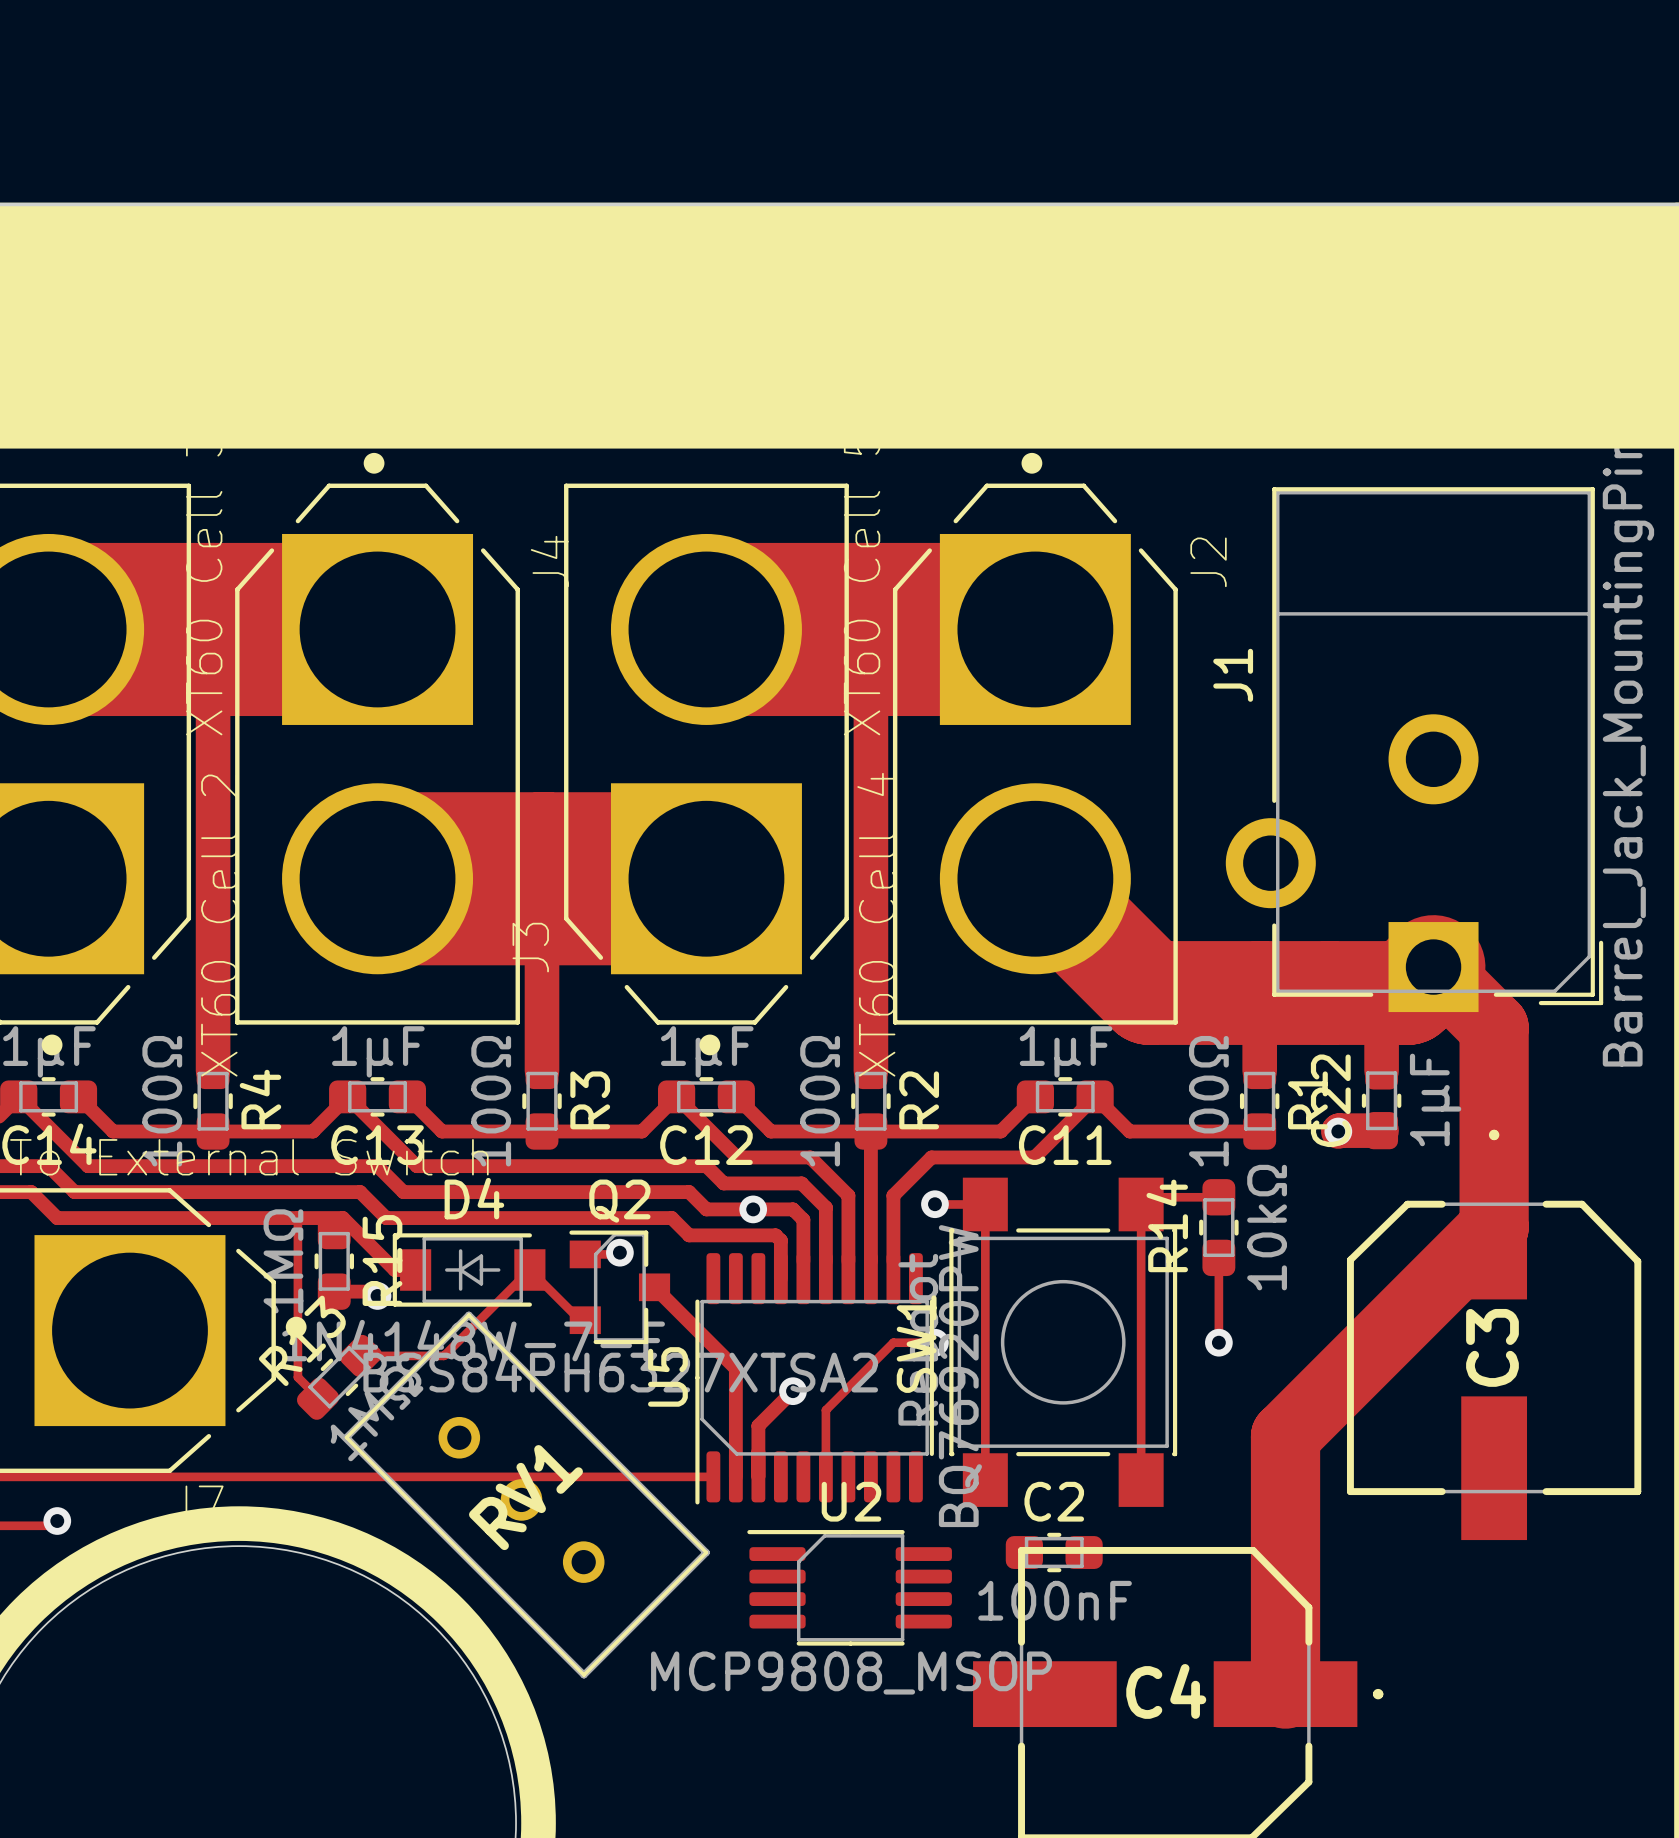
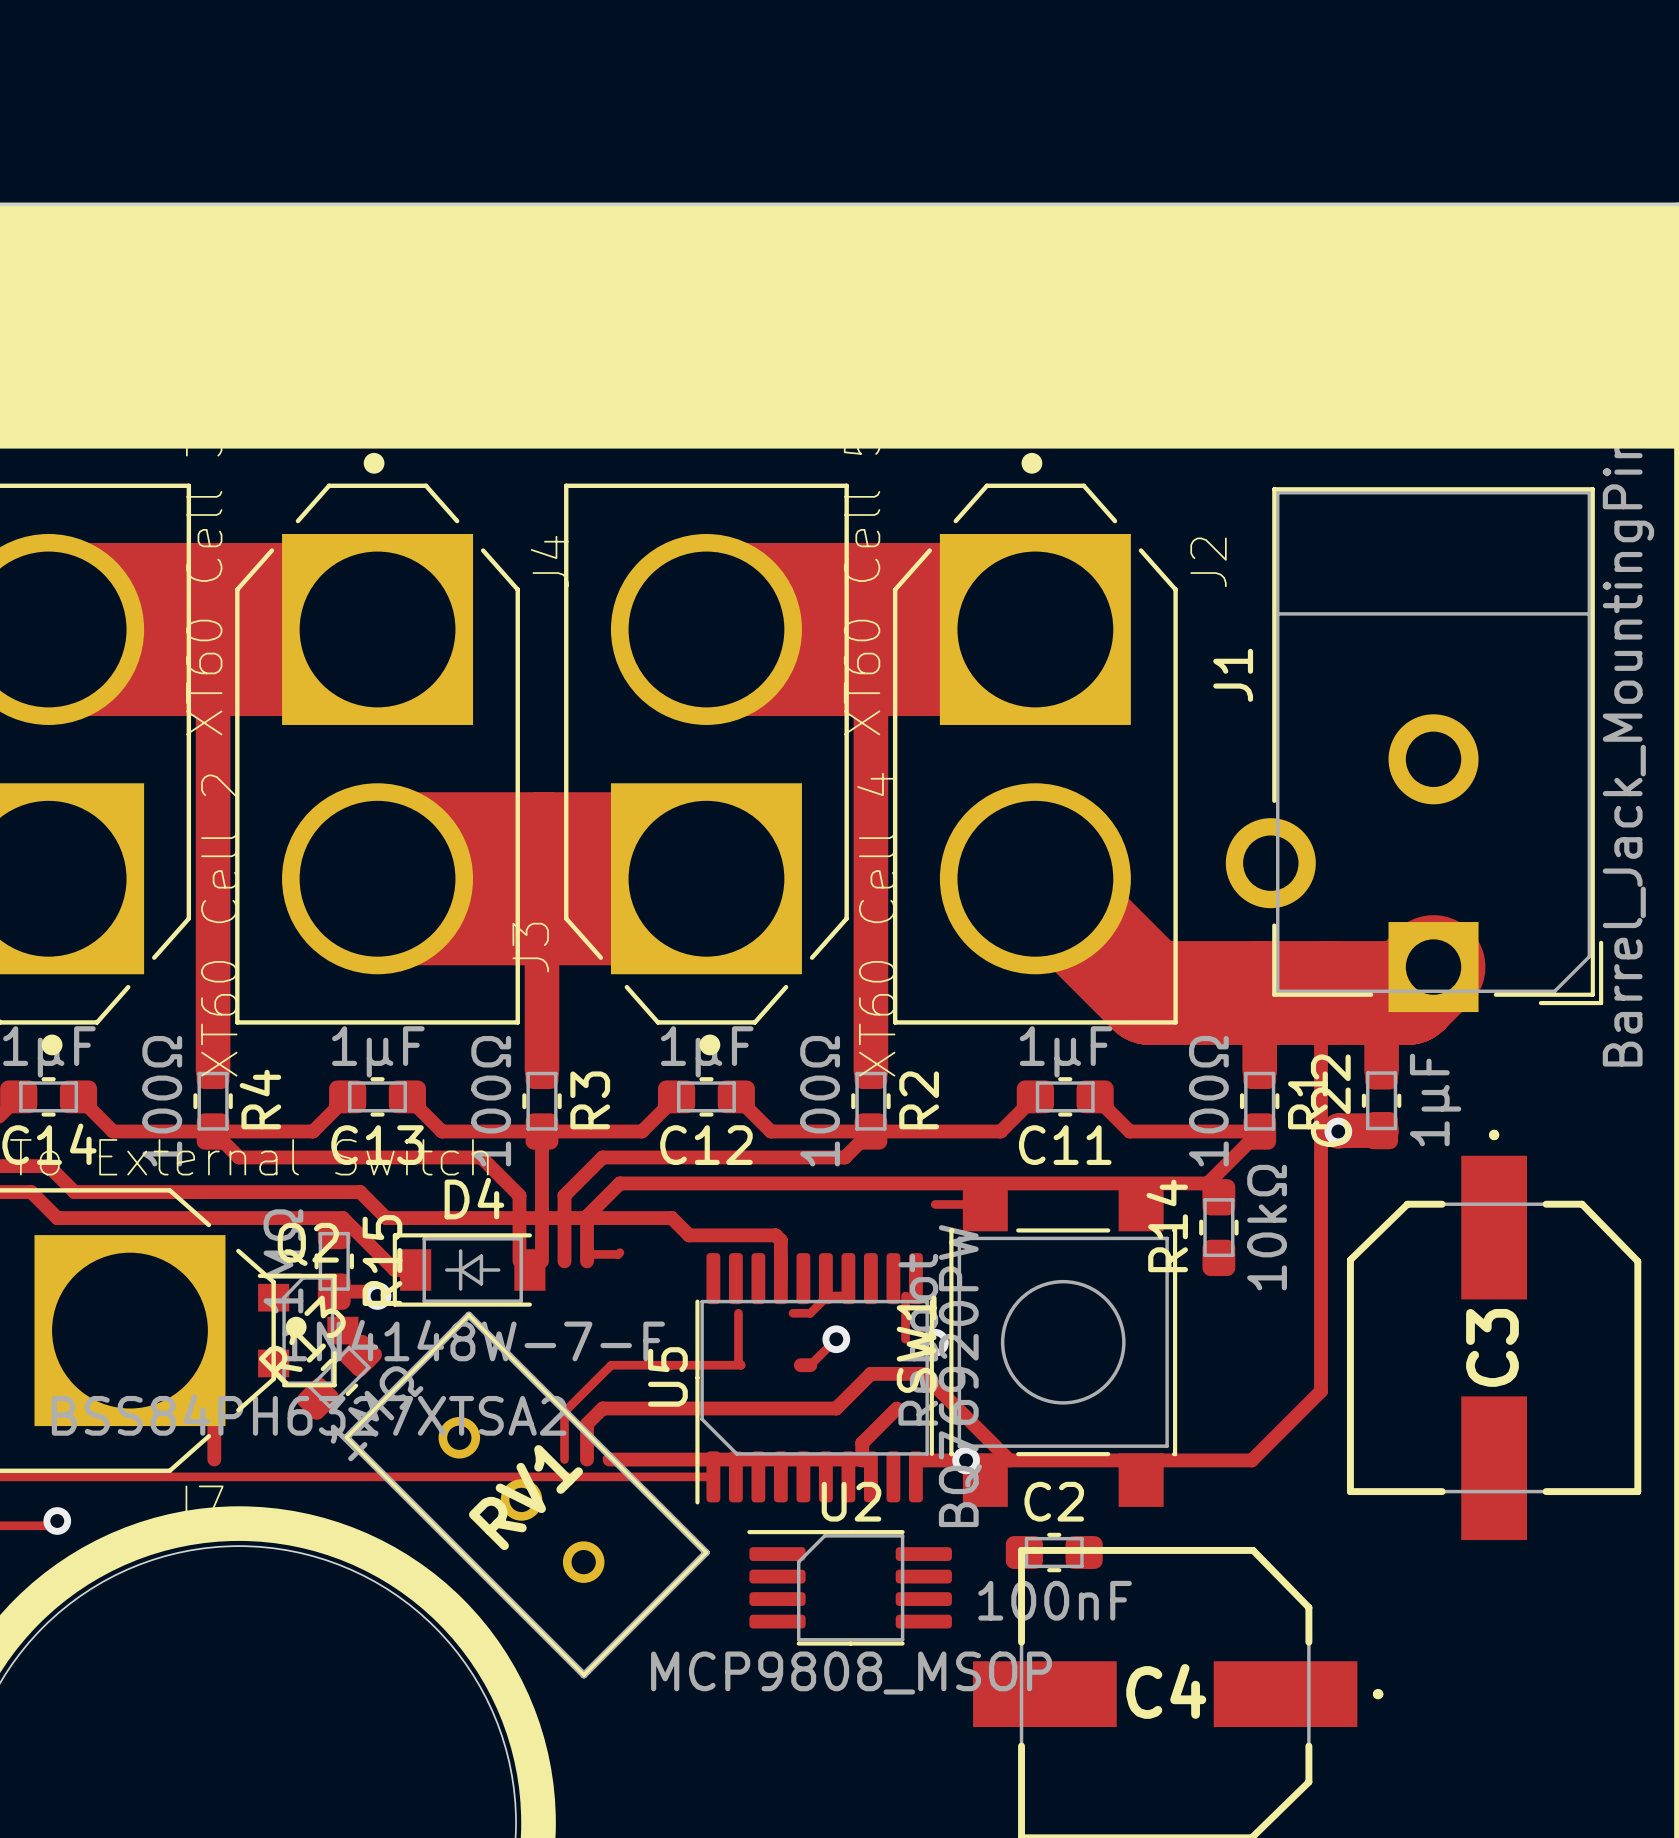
track: (1433, 967) (1494, 1027) (1494, 1227) (1285, 1436) (1285, 1694) -> none
track: none -> (1321, 993) (1321, 1391) (1251, 1460) (1009, 1460) (922, 1373) (870, 1373) (836, 1408) (602, 1408) (587, 1424) (587, 1459)
track: (18, 1096) (88, 1166) (377, 1166) (403, 1192) (689, 1192) (706, 1209) (793, 1209) (803, 1219) (803, 1261) -> none
track: (347, 1096) (416, 1166) (706, 1166) (723, 1183) -> (587, 1261) (587, 1216) (619, 1183) (723, 1183)
track: (676, 1096) (737, 1157) -> (564, 1261) (564, 1195) (602, 1157) (737, 1157)
track: (1095, 1096) (1034, 1157) (931, 1157) (893, 1195) (893, 1261) -> none
track: none -> (213, 1131) (239, 1157) (481, 1157) (519, 1195) (519, 1261)
track: none -> (542, 1131) (542, 1261)
track: (870, 1131) (870, 1261) -> (870, 1131) (844, 1157) (810, 1157)
track: (810, 1157) (848, 1195) (848, 1261) -> none
track: (801, 1183) (825, 1207) (825, 1261) -> (801, 1183) (1207, 1183) (1259, 1131)
track: (1218, 1197) (1148, 1197) (1141, 1204) (1141, 1480) -> none
track: (987, 1202) (985, 1204) (985, 1480) -> none
via: (934, 1204) -> none
via: (753, 1209) -> none
track: (297, 1218) (297, 1377) (318, 1398) -> none
via: (619, 1252) -> none
track: (1218, 1257) (1218, 1342) -> none
Q2 position: (619, 1287) -> (308, 1330)
track: (654, 1287) (735, 1368) (735, 1476) -> none
track: none -> (844, 1295) (827, 1295) (810, 1313) (793, 1313)
track: none -> (905, 1295) (905, 1339)
track: none -> (738, 1313) (738, 1362) (741, 1365) (611, 1365) (564, 1411) (564, 1459)
track: (585, 1320) (580, 1320) (529, 1269) (443, 1355) (360, 1355) -> none
track: none -> (836, 1339) (810, 1365) (800, 1365)
track: (934, 1342) (893, 1342) (825, 1410) (825, 1476) -> none
via: (1218, 1342) -> none
track: (793, 1391) (758, 1425) (758, 1476) -> none
via position: (793, 1391) -> (836, 1339)
track: none -> (896, 1408) (862, 1443) (862, 1460) (609, 1459)
track: none -> (214, 1414) (214, 1459)
track: none -> (921, 1460) (966, 1460)
via: none -> (966, 1460)

